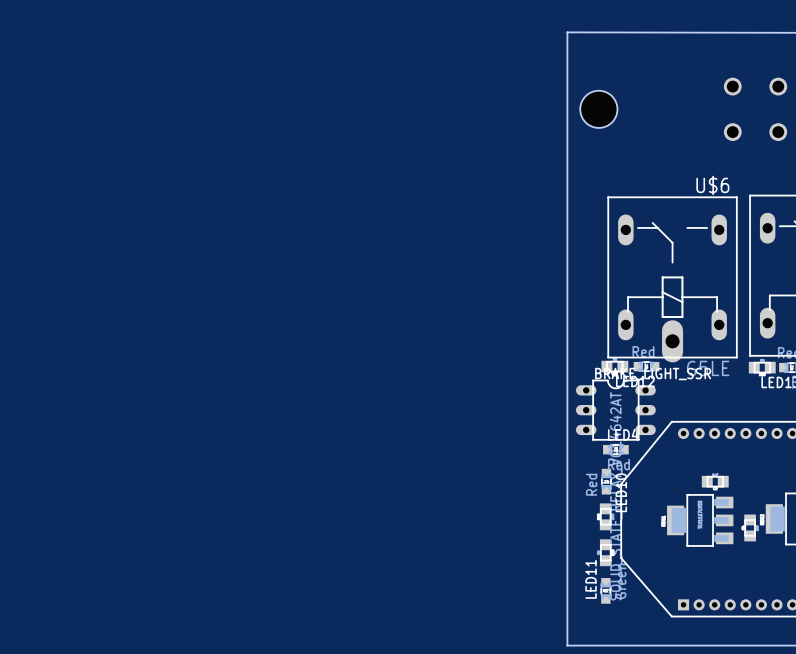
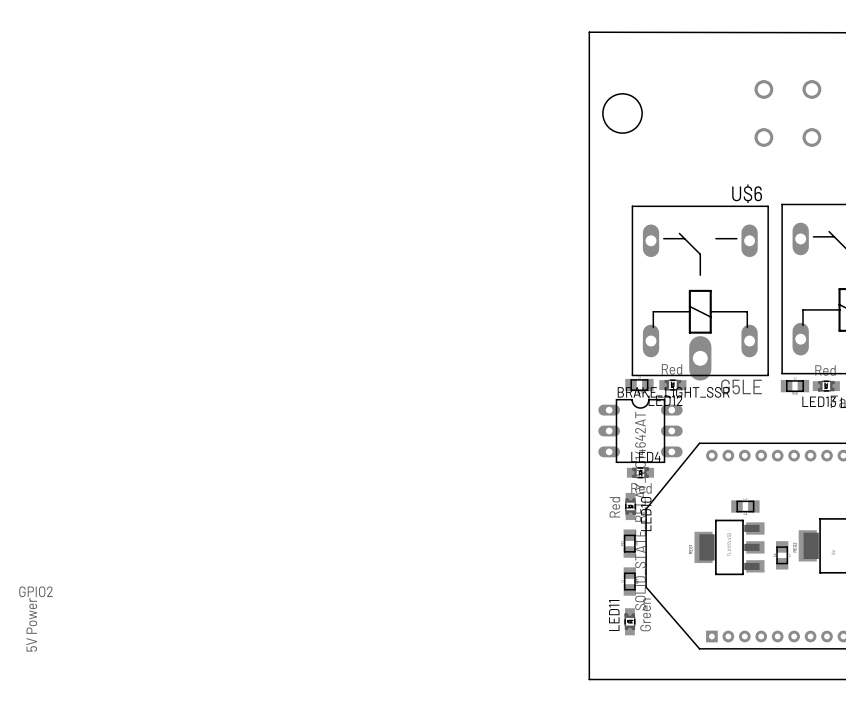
text: none -> GPIO2 (36, 591)
text: none -> 5V Power (31, 624)

